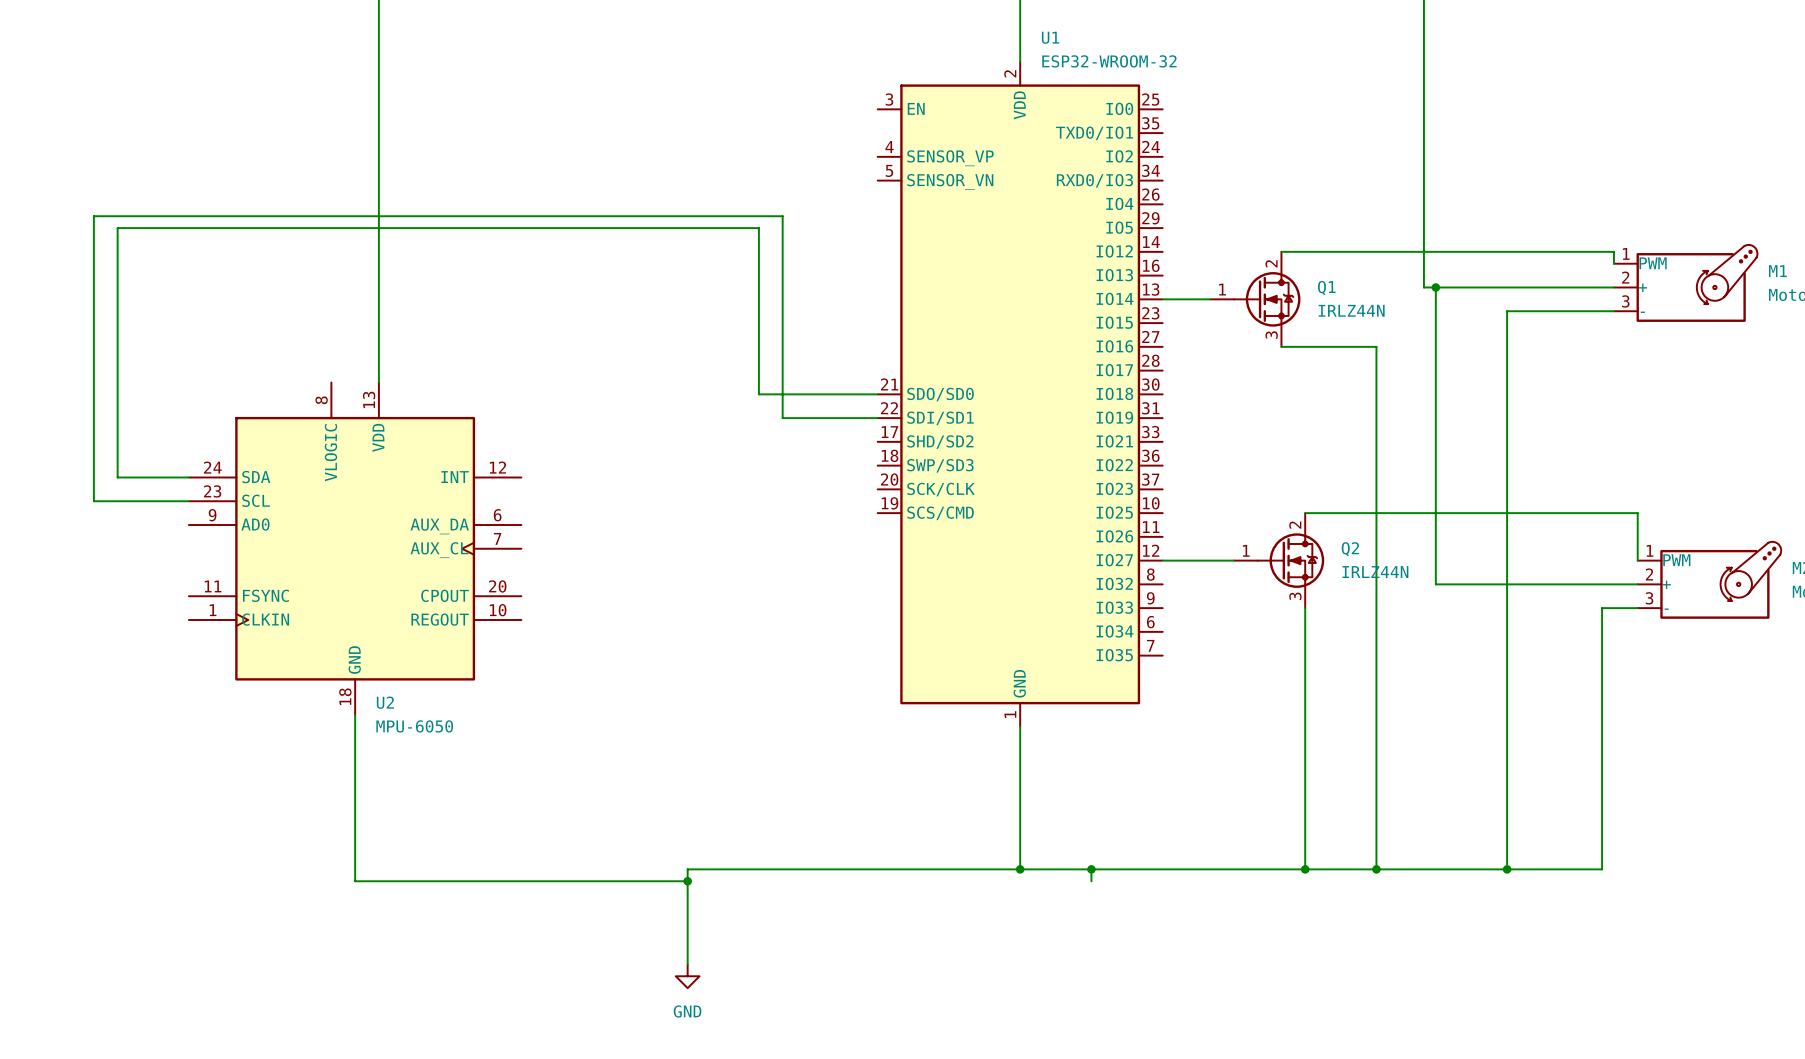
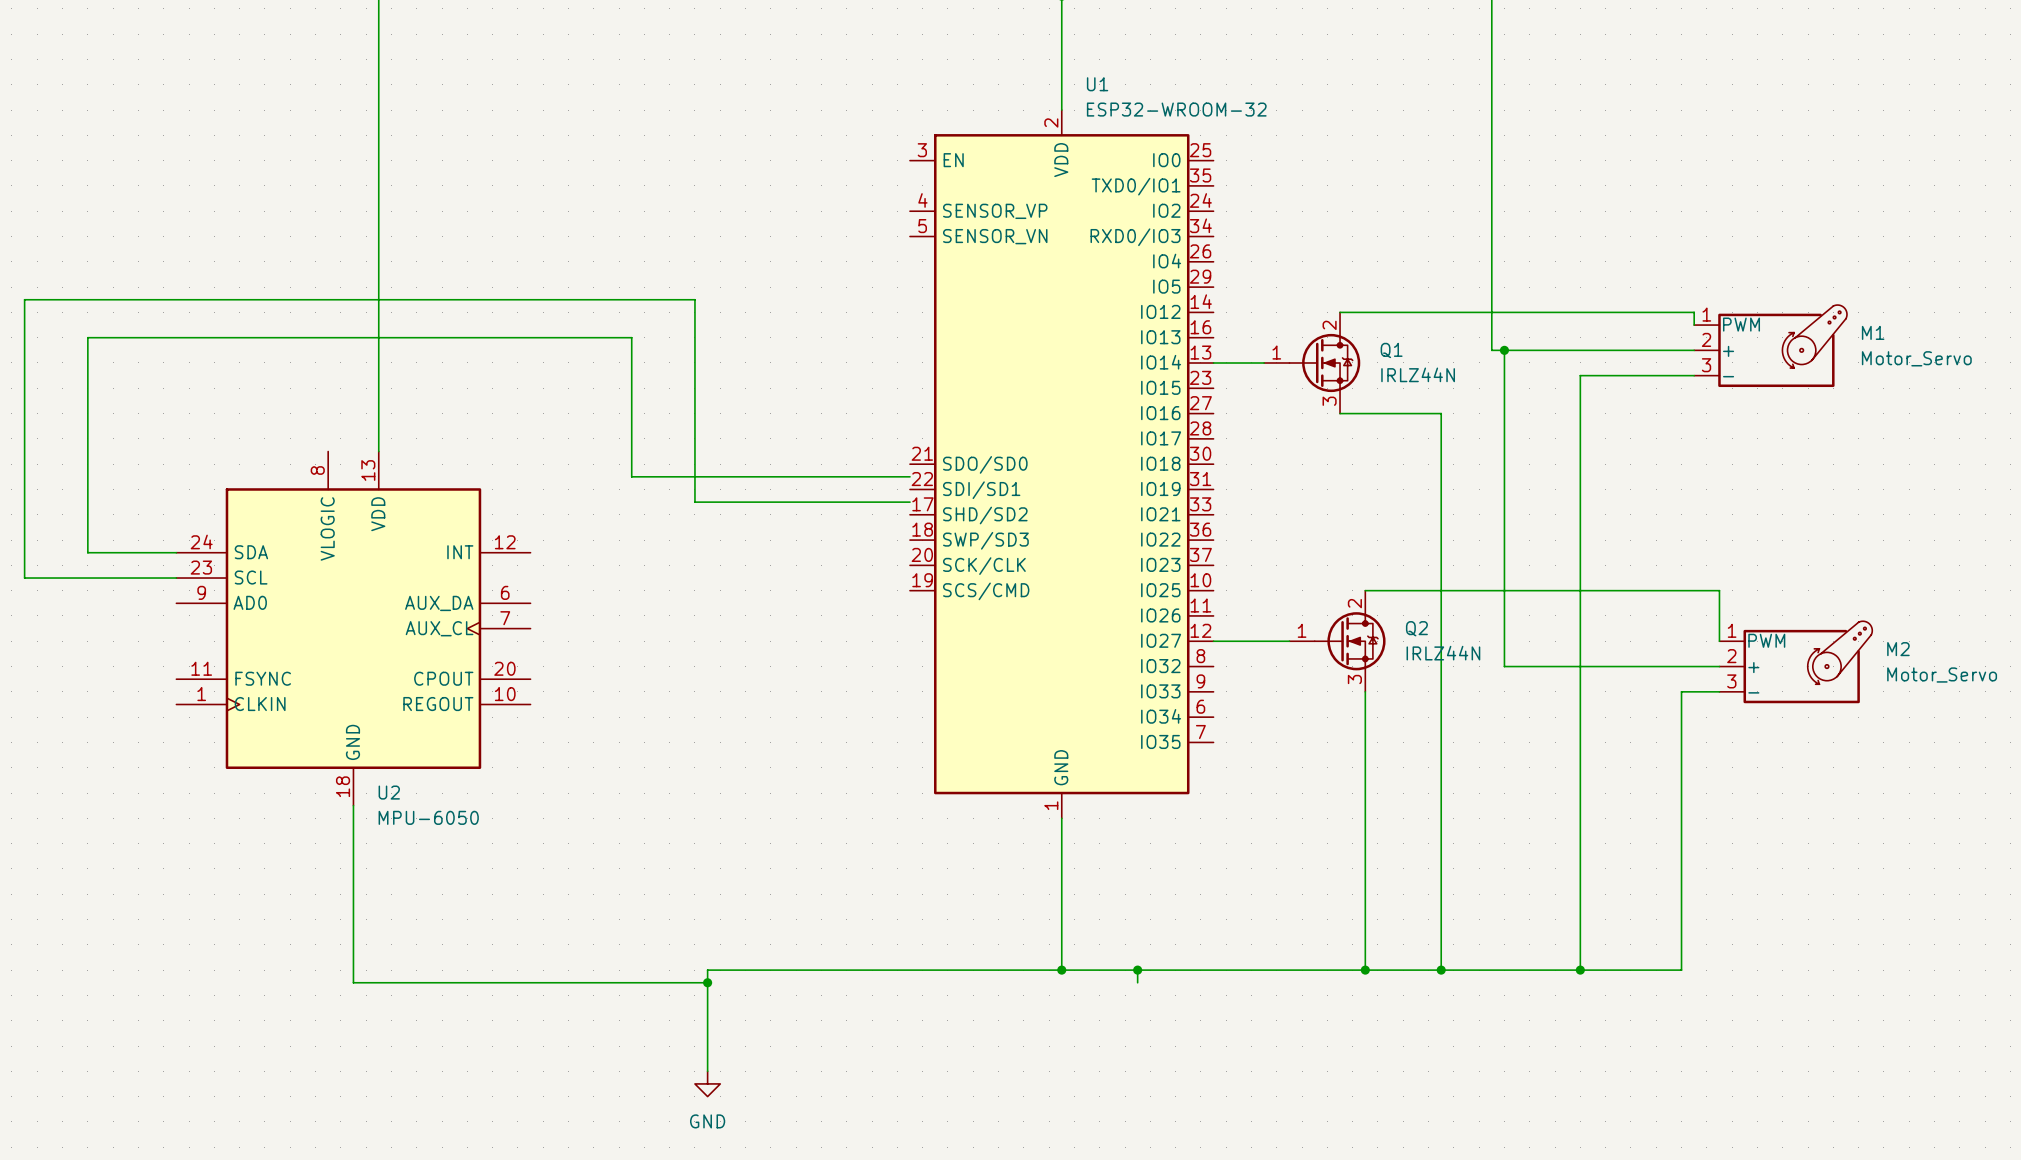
wire: (877, 394) (758, 394) (758, 228) (117, 228) (117, 477) -> (909, 476) (631, 476) (631, 337) (87, 337) (87, 552) (100, 552)
wire: (877, 418) (782, 418) (782, 216) (93, 216) (93, 501) -> (909, 502) (694, 502) (694, 299) (24, 299) (24, 578) (75, 578)

